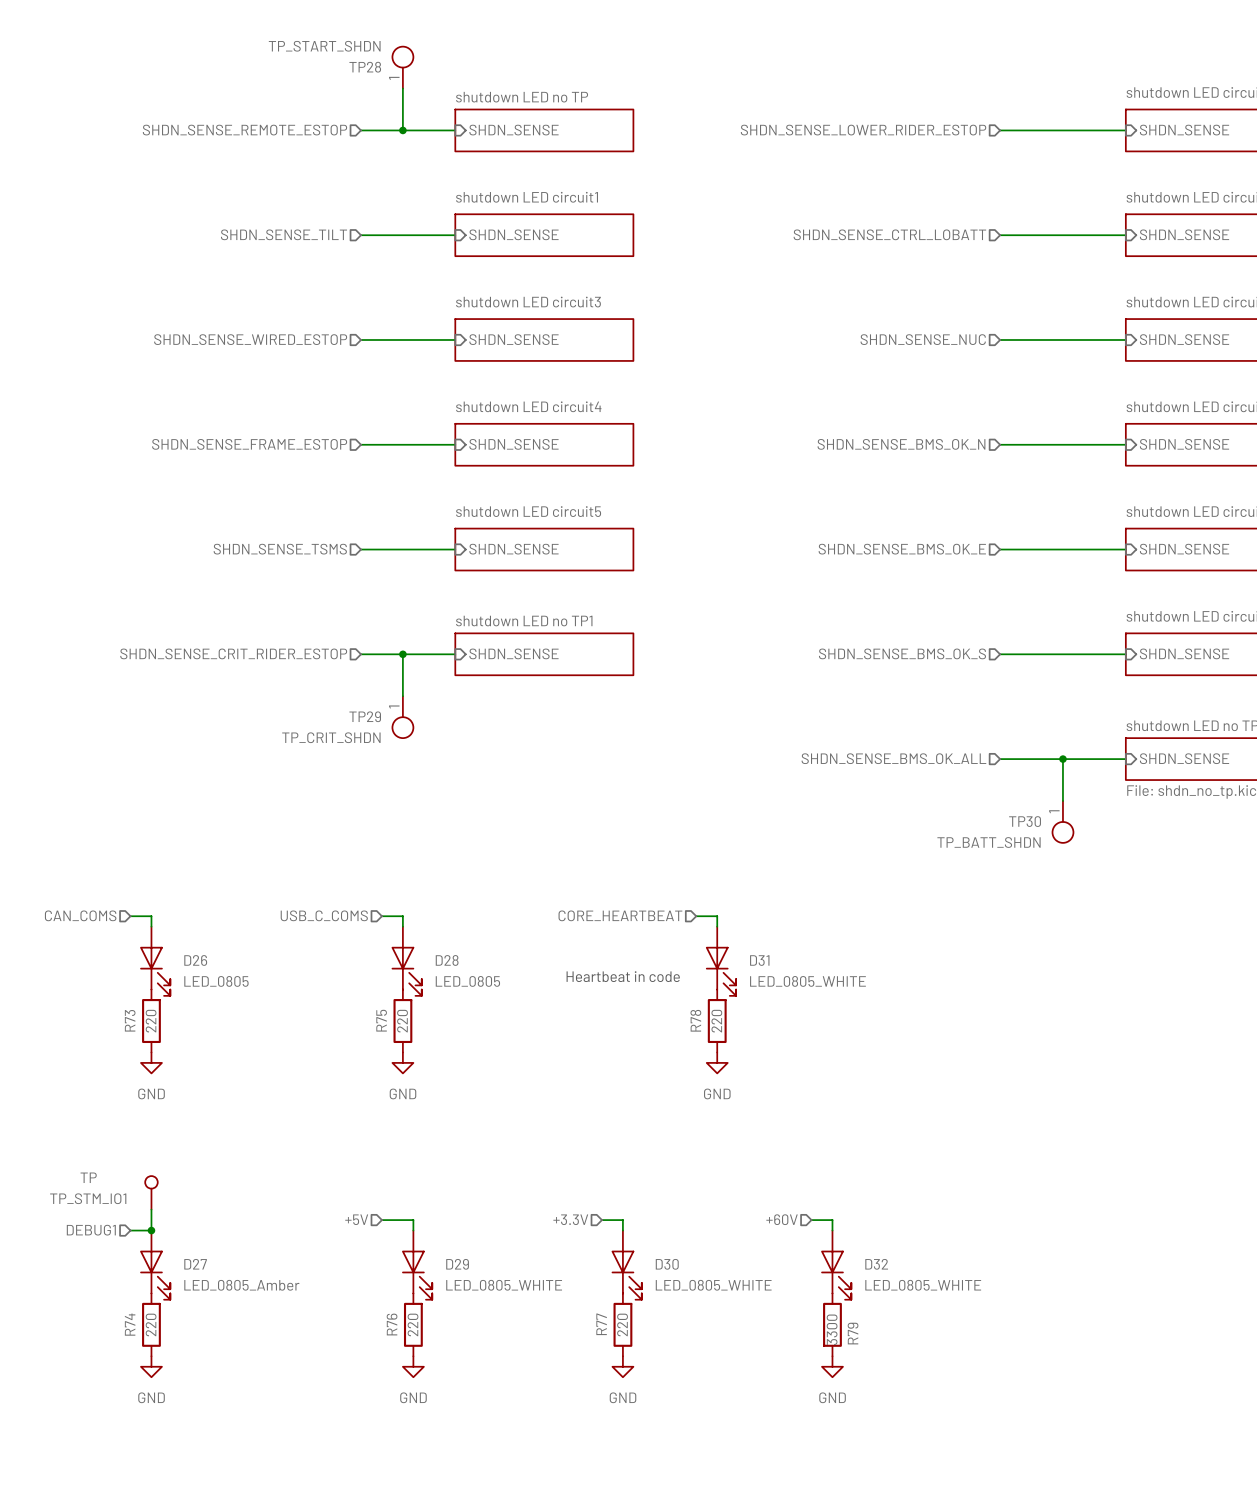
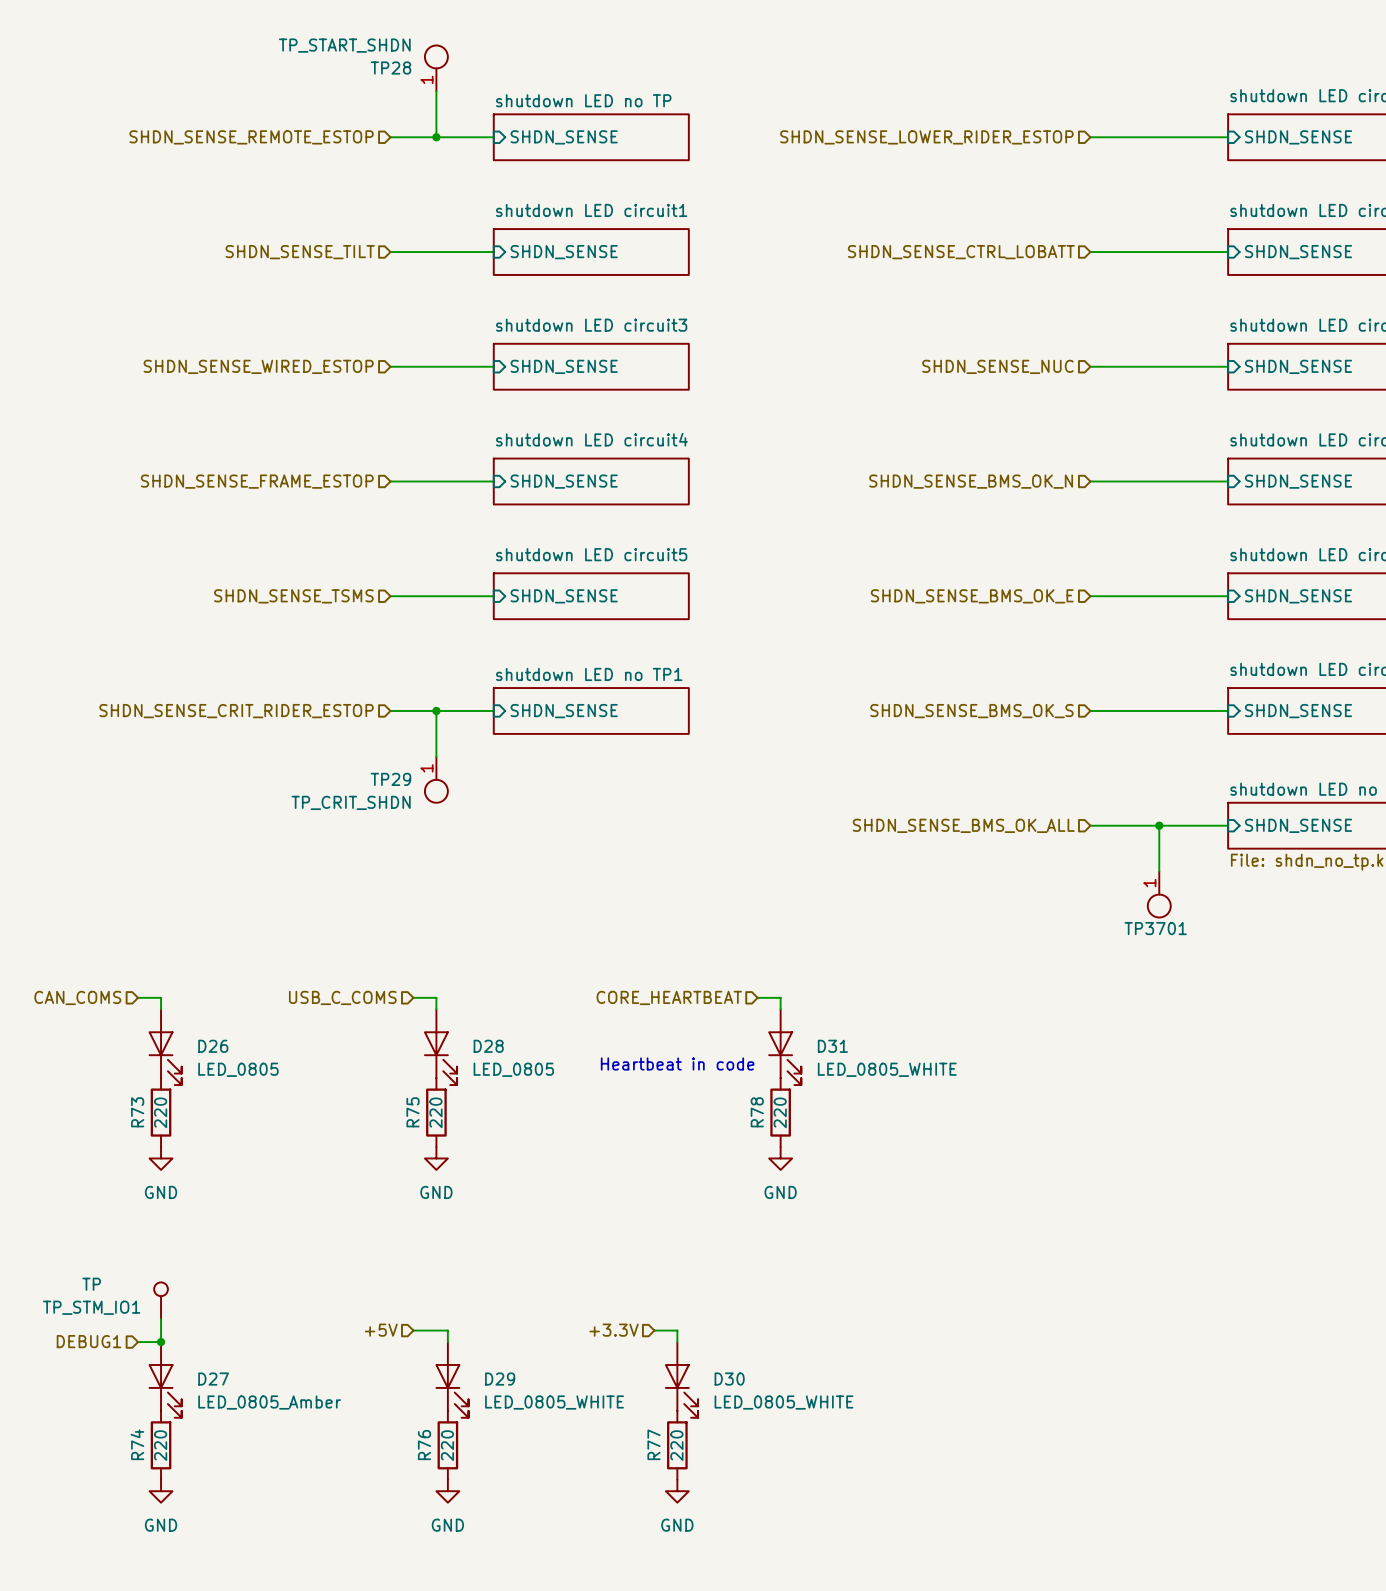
TP30 name: TP30 (1025, 821) -> TP3701 (1155, 928)
TP30 value: TP_BATT_SHDN (989, 842) -> none
hierarchical label: +60V (782, 1219) -> none
wire: (811, 1220) (832, 1220) (832, 1230) -> none
D32: LED_0805_WHITE (836, 1265) -> none
R79: 3300 (832, 1324) -> none
power symbol: GND (832, 1366) -> none

